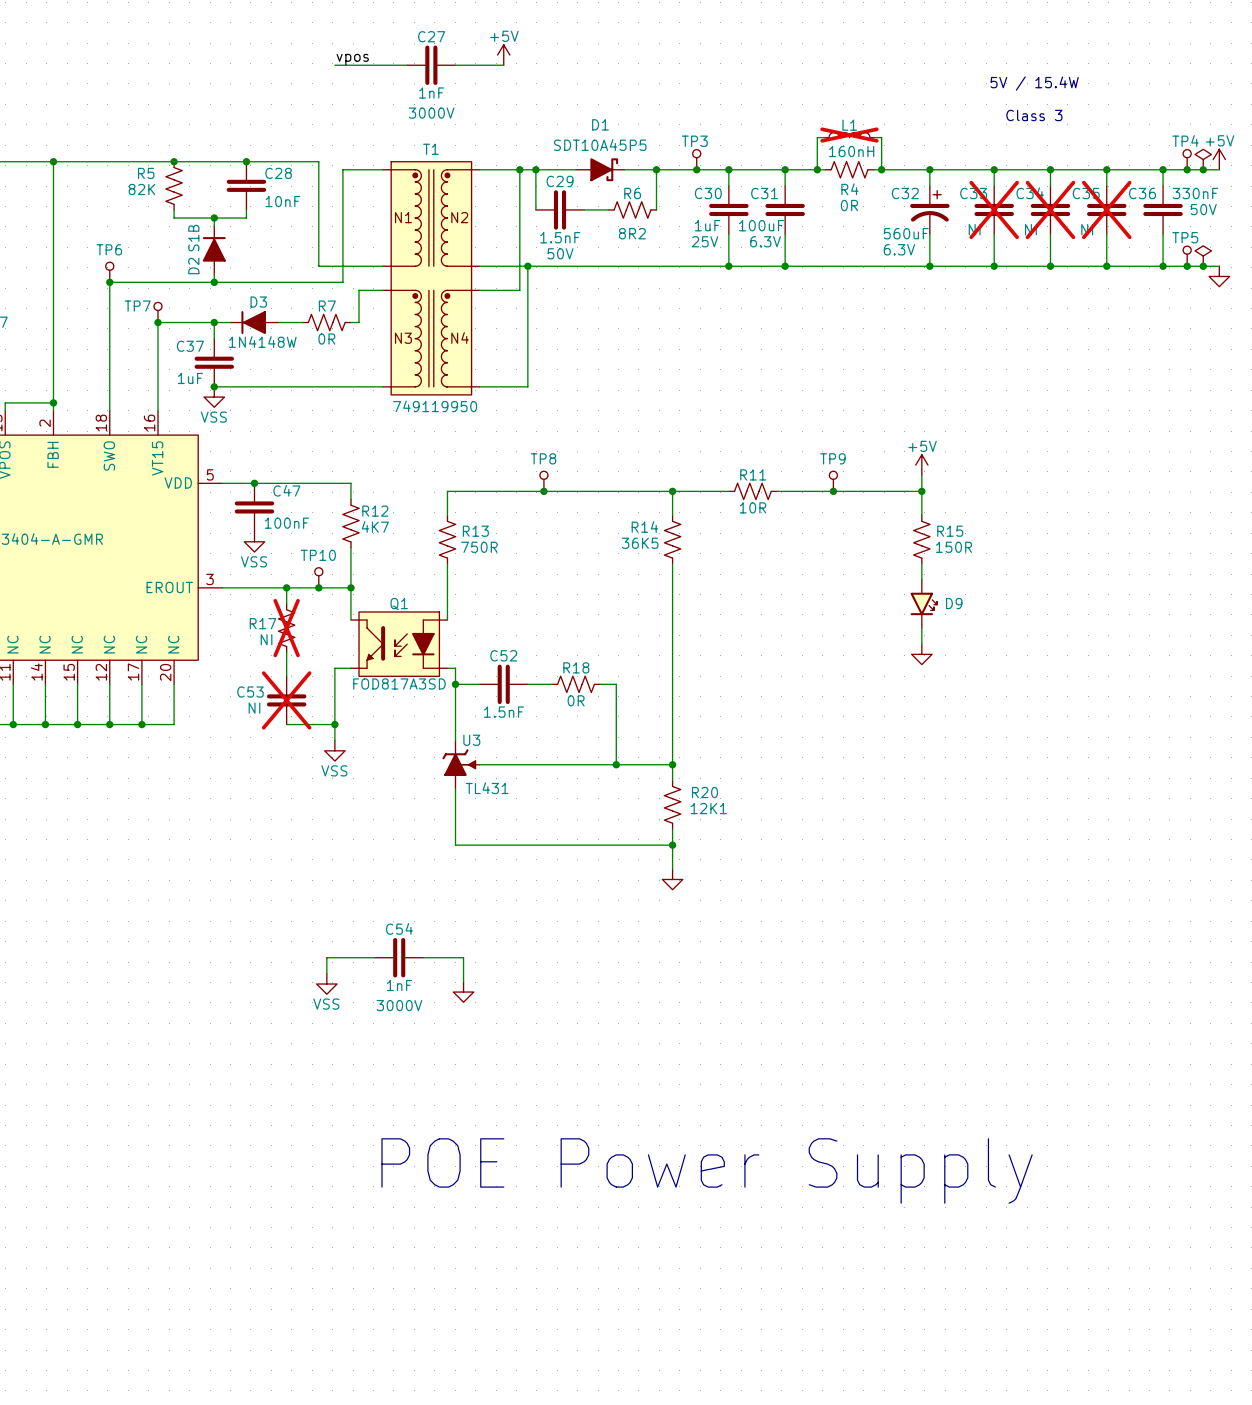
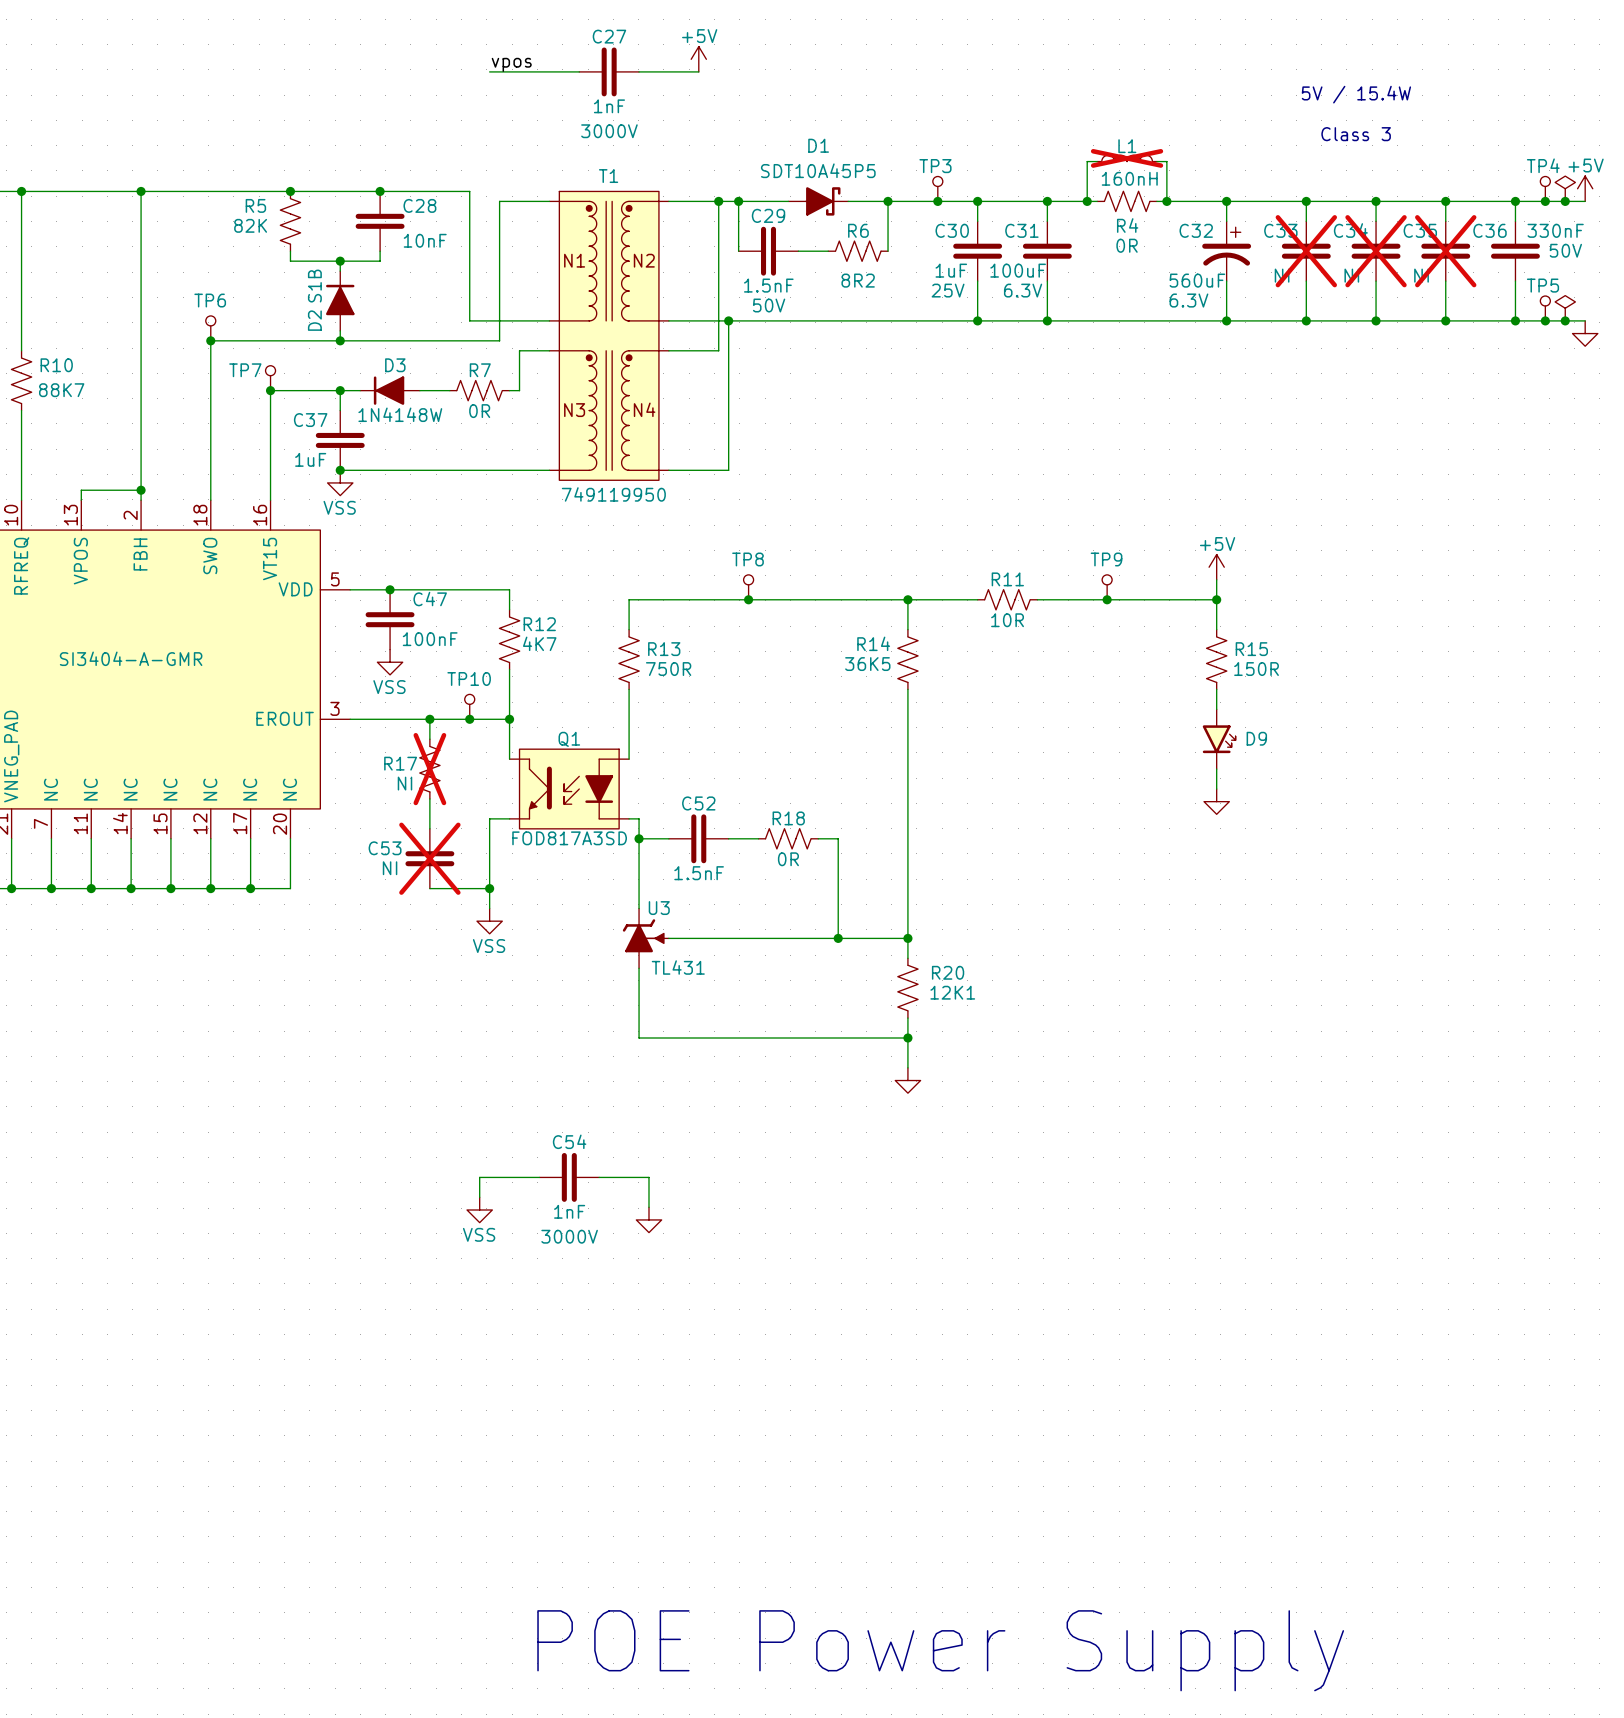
text position: POE Power Supply (707, 1170) -> POE Power Supply (940, 1650)

